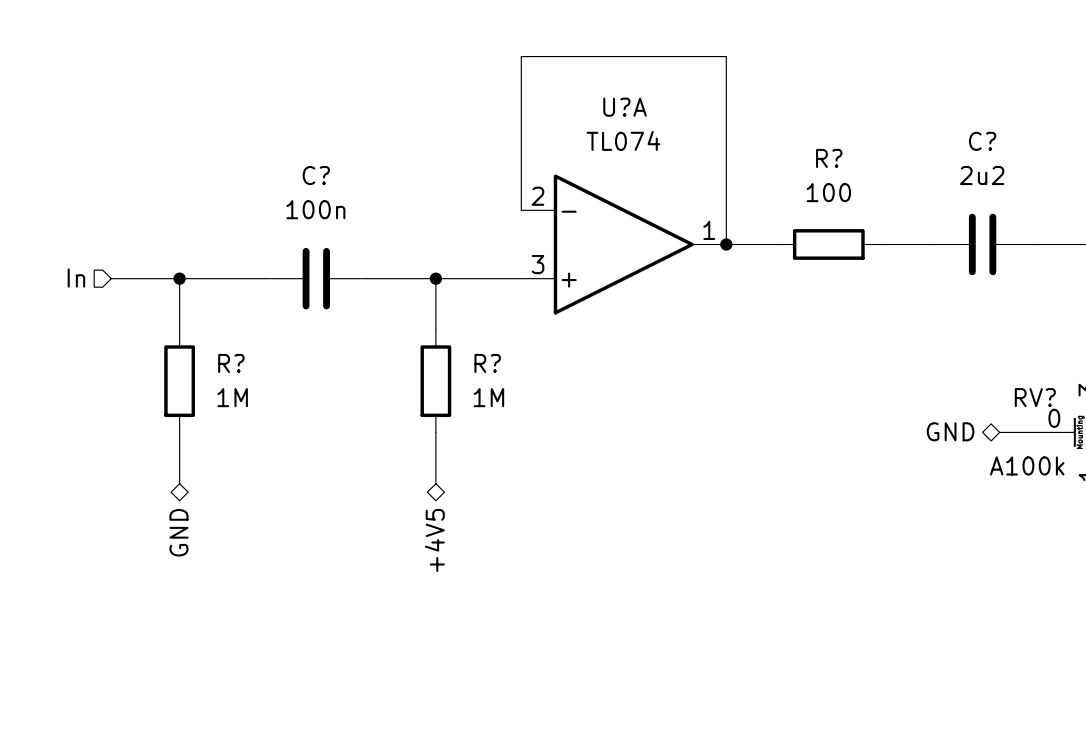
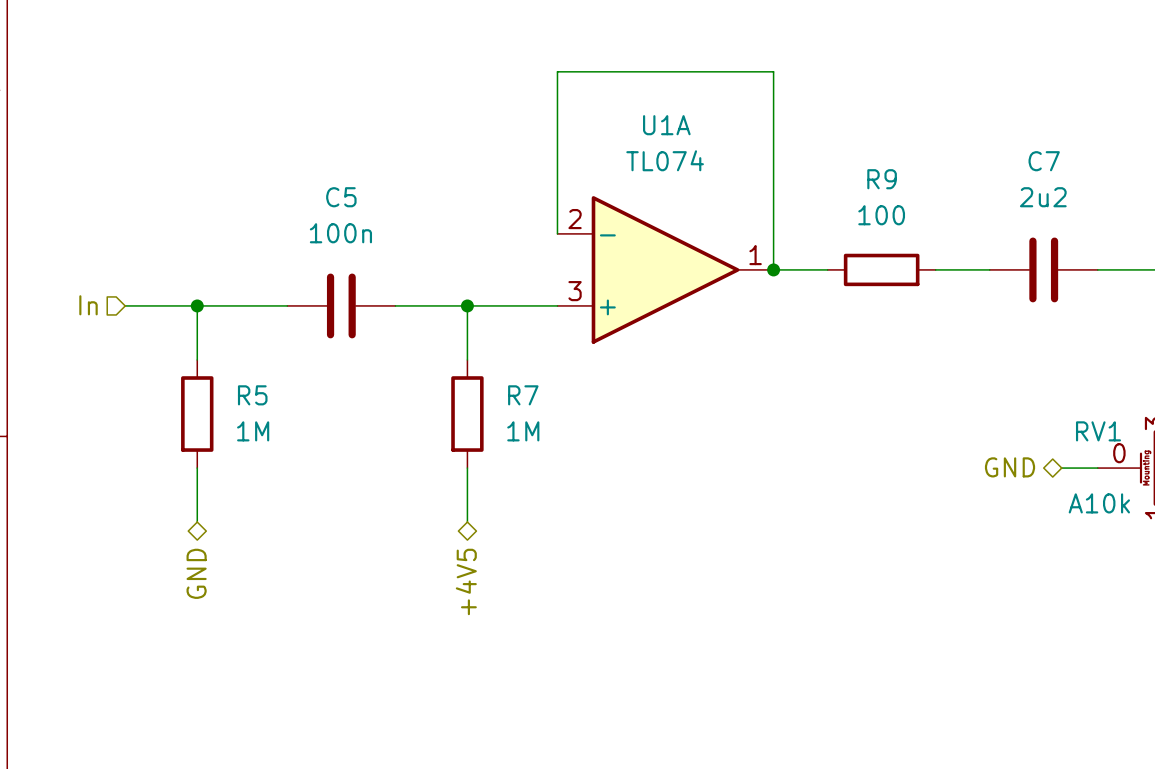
U?A name: U?A (625, 107) -> U1A (666, 125)
C? name: C? (982, 141) -> C7 (1044, 161)
R? name: R? (829, 158) -> R9 (882, 179)
C? name: C? (316, 175) -> C5 (341, 197)
R? name: R? (231, 363) -> R5 (252, 395)
R? name: R? (487, 363) -> R7 (523, 395)
RV? name: RV? (1035, 397) -> RV1 (1098, 431)
RV? value: A100k (1027, 465) -> A10k (1099, 503)

